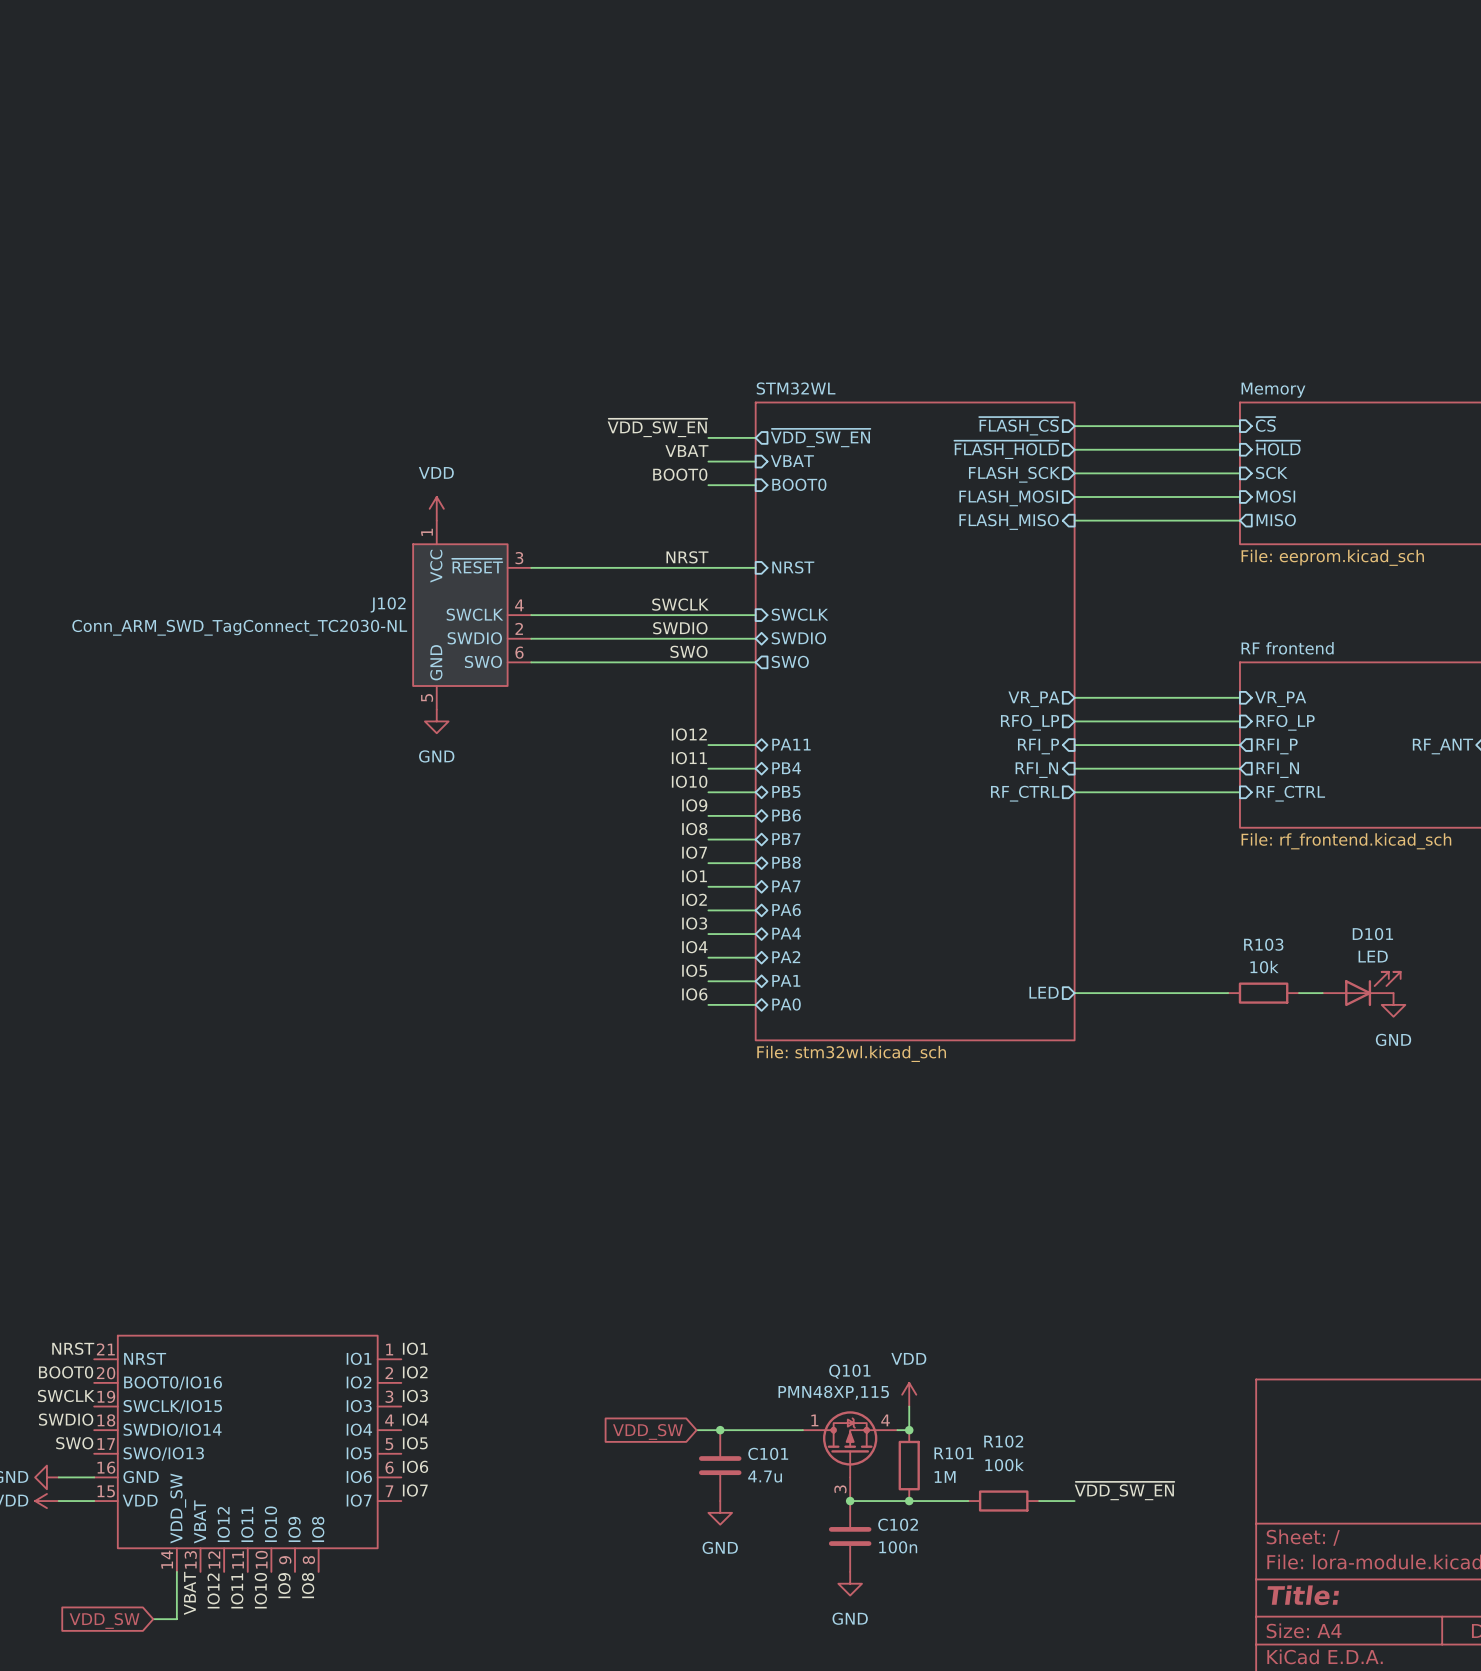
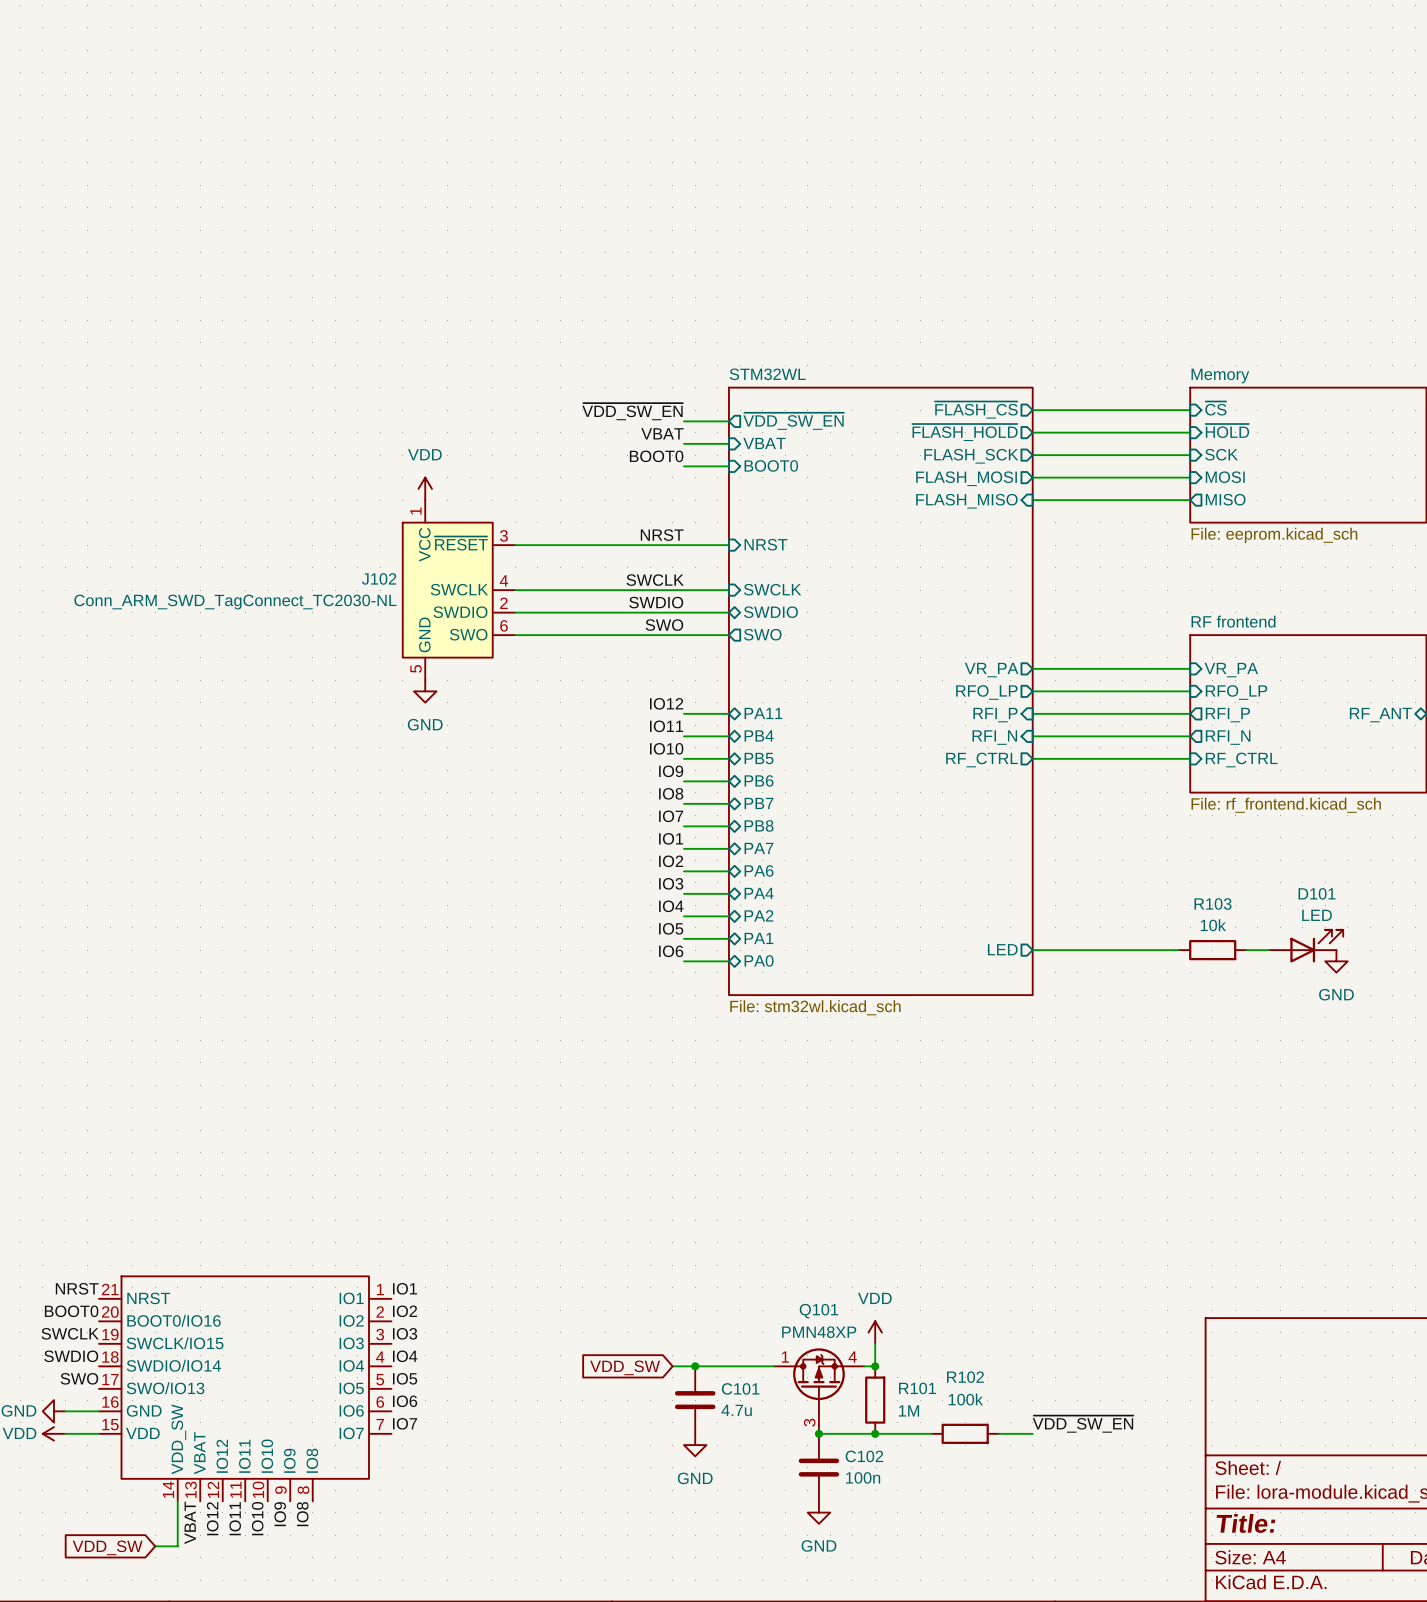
Q101 value: PMN48XP,115 (833, 1392) -> PMN48XP (819, 1332)

